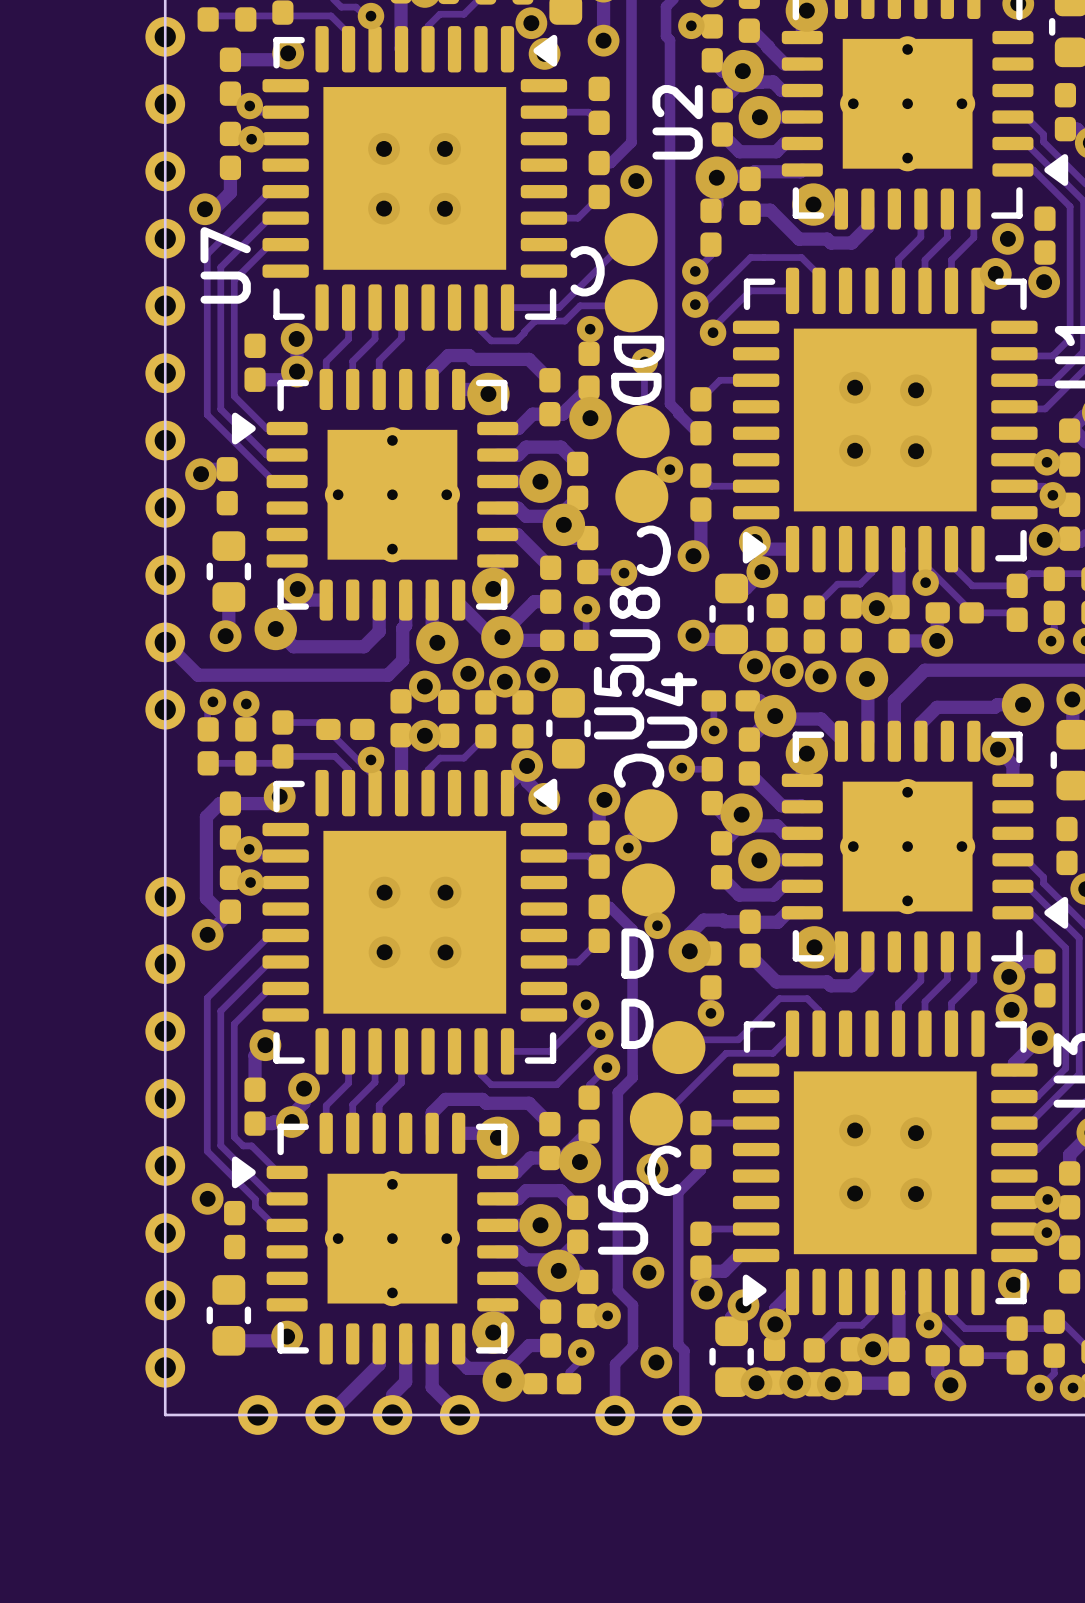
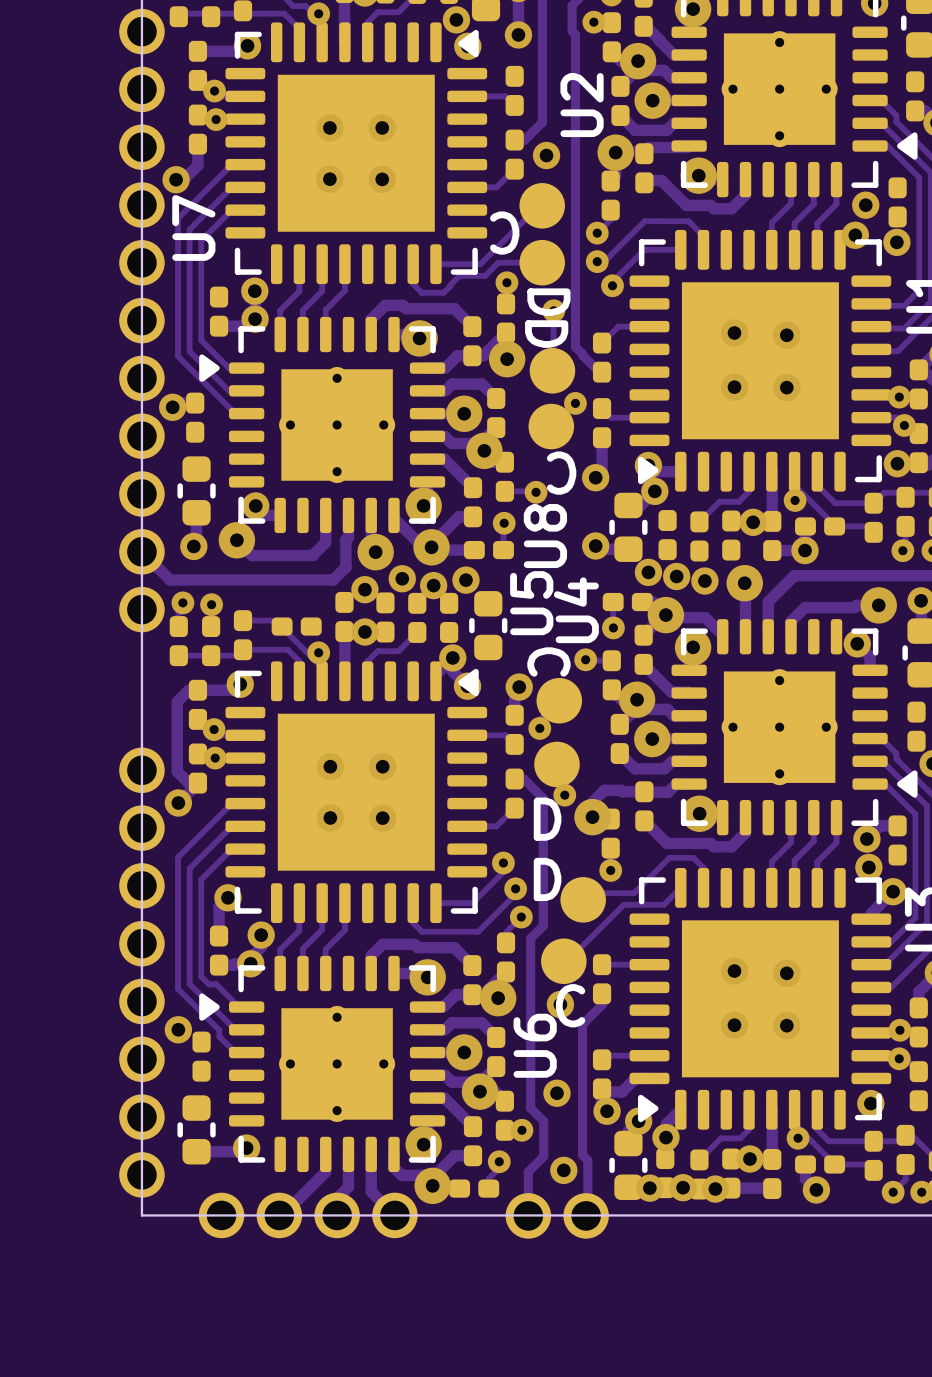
part footprint: [145, 16, 186, 730] -> [119, 8, 165, 633]
part footprint: [145, 876, 186, 1388] -> [119, 747, 165, 1198]
part footprint: [238, 1395, 480, 1435] -> [198, 1192, 418, 1239]
part footprint: [595, 1395, 703, 1436] -> [505, 1193, 609, 1239]

